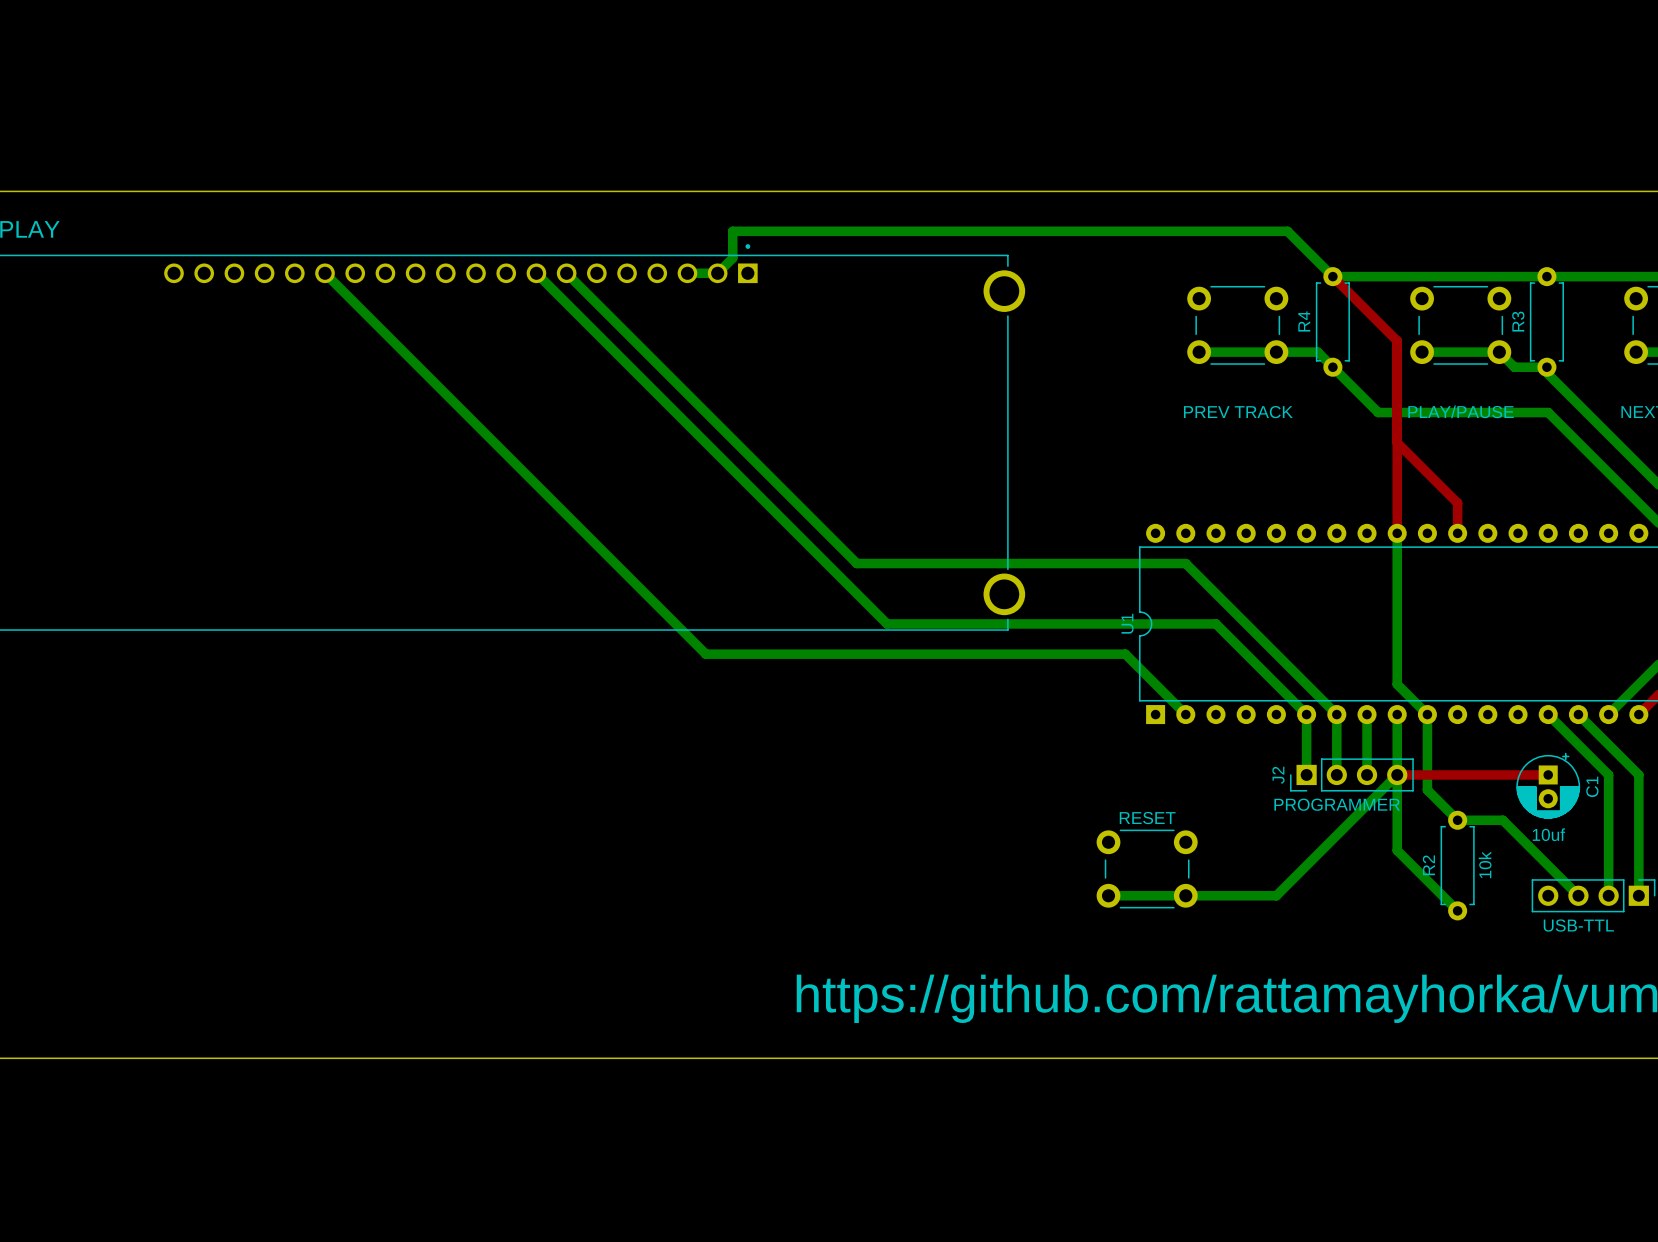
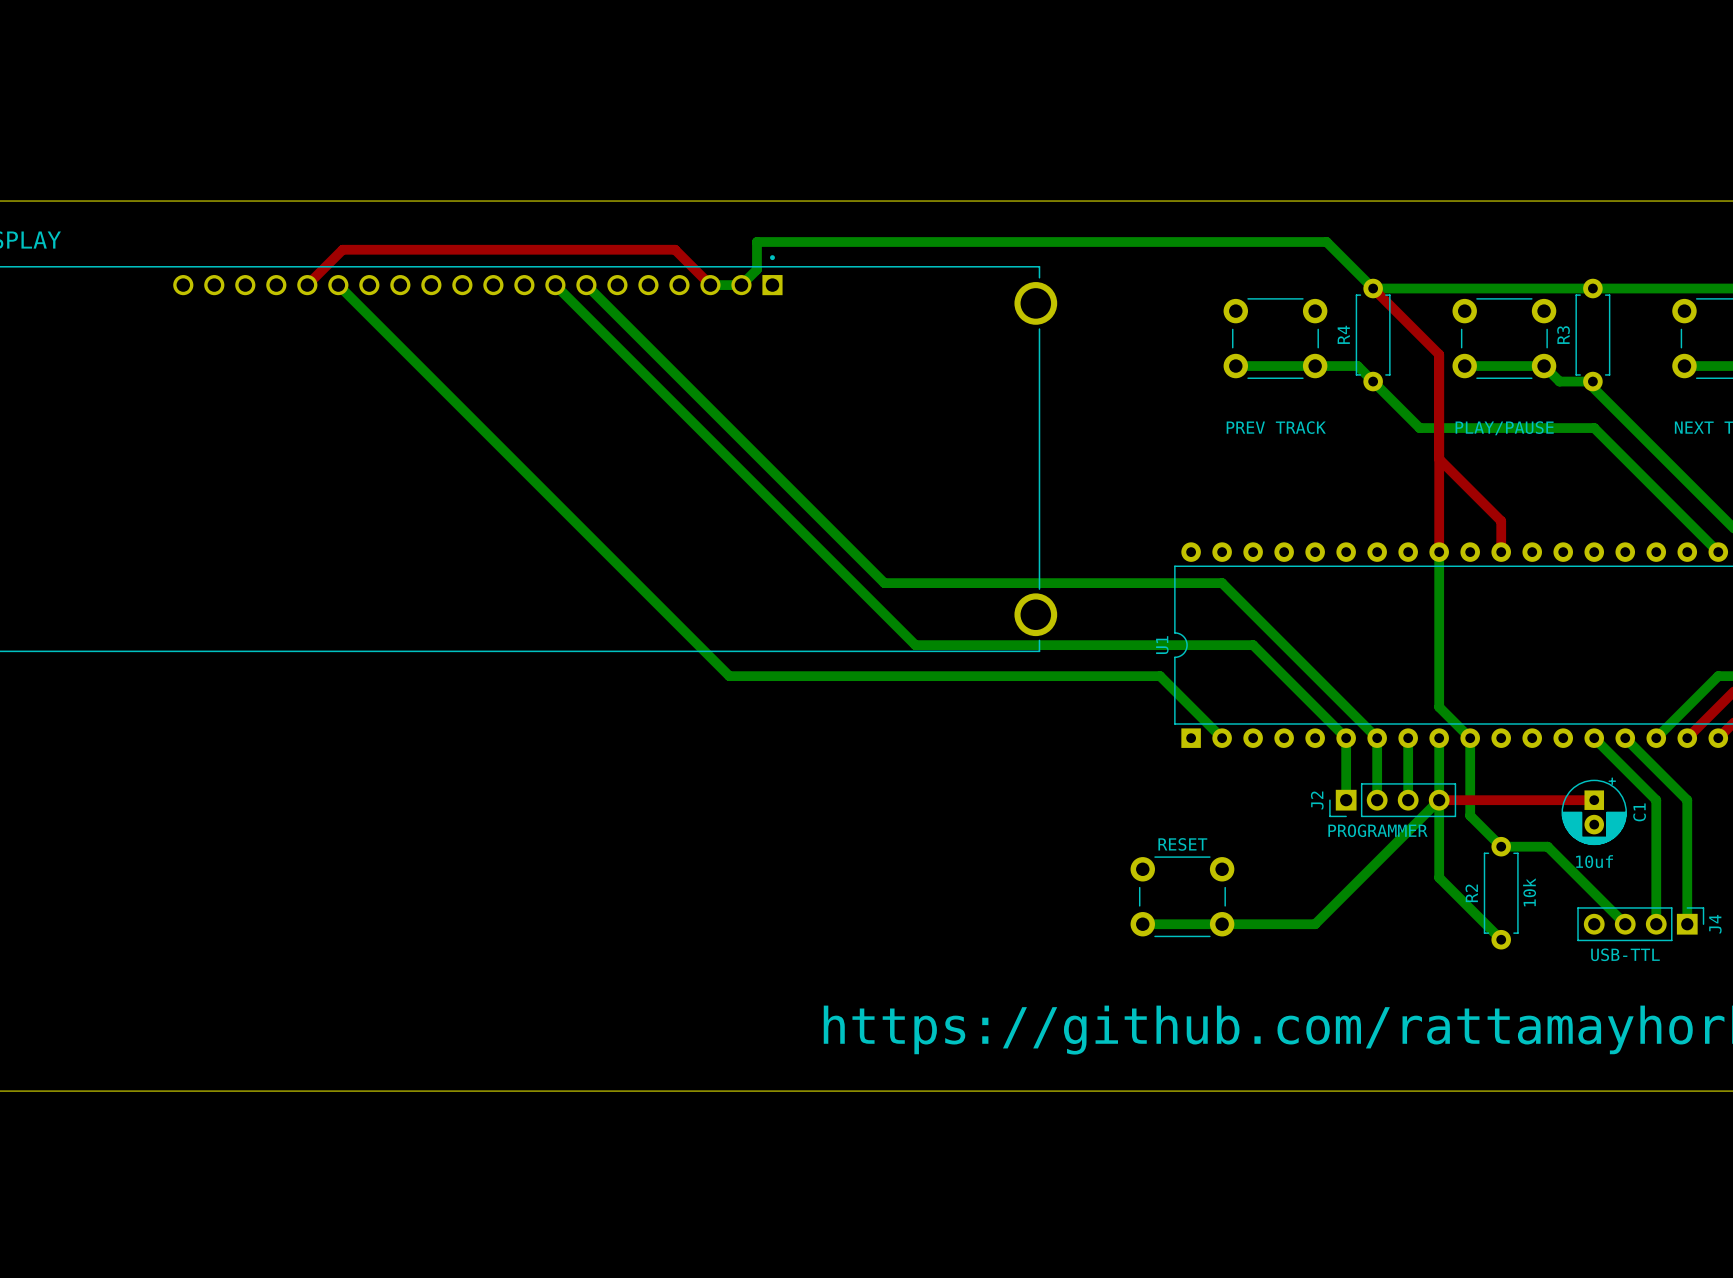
top track: none -> (307, 285) (342, 249) (675, 249) (710, 285)

